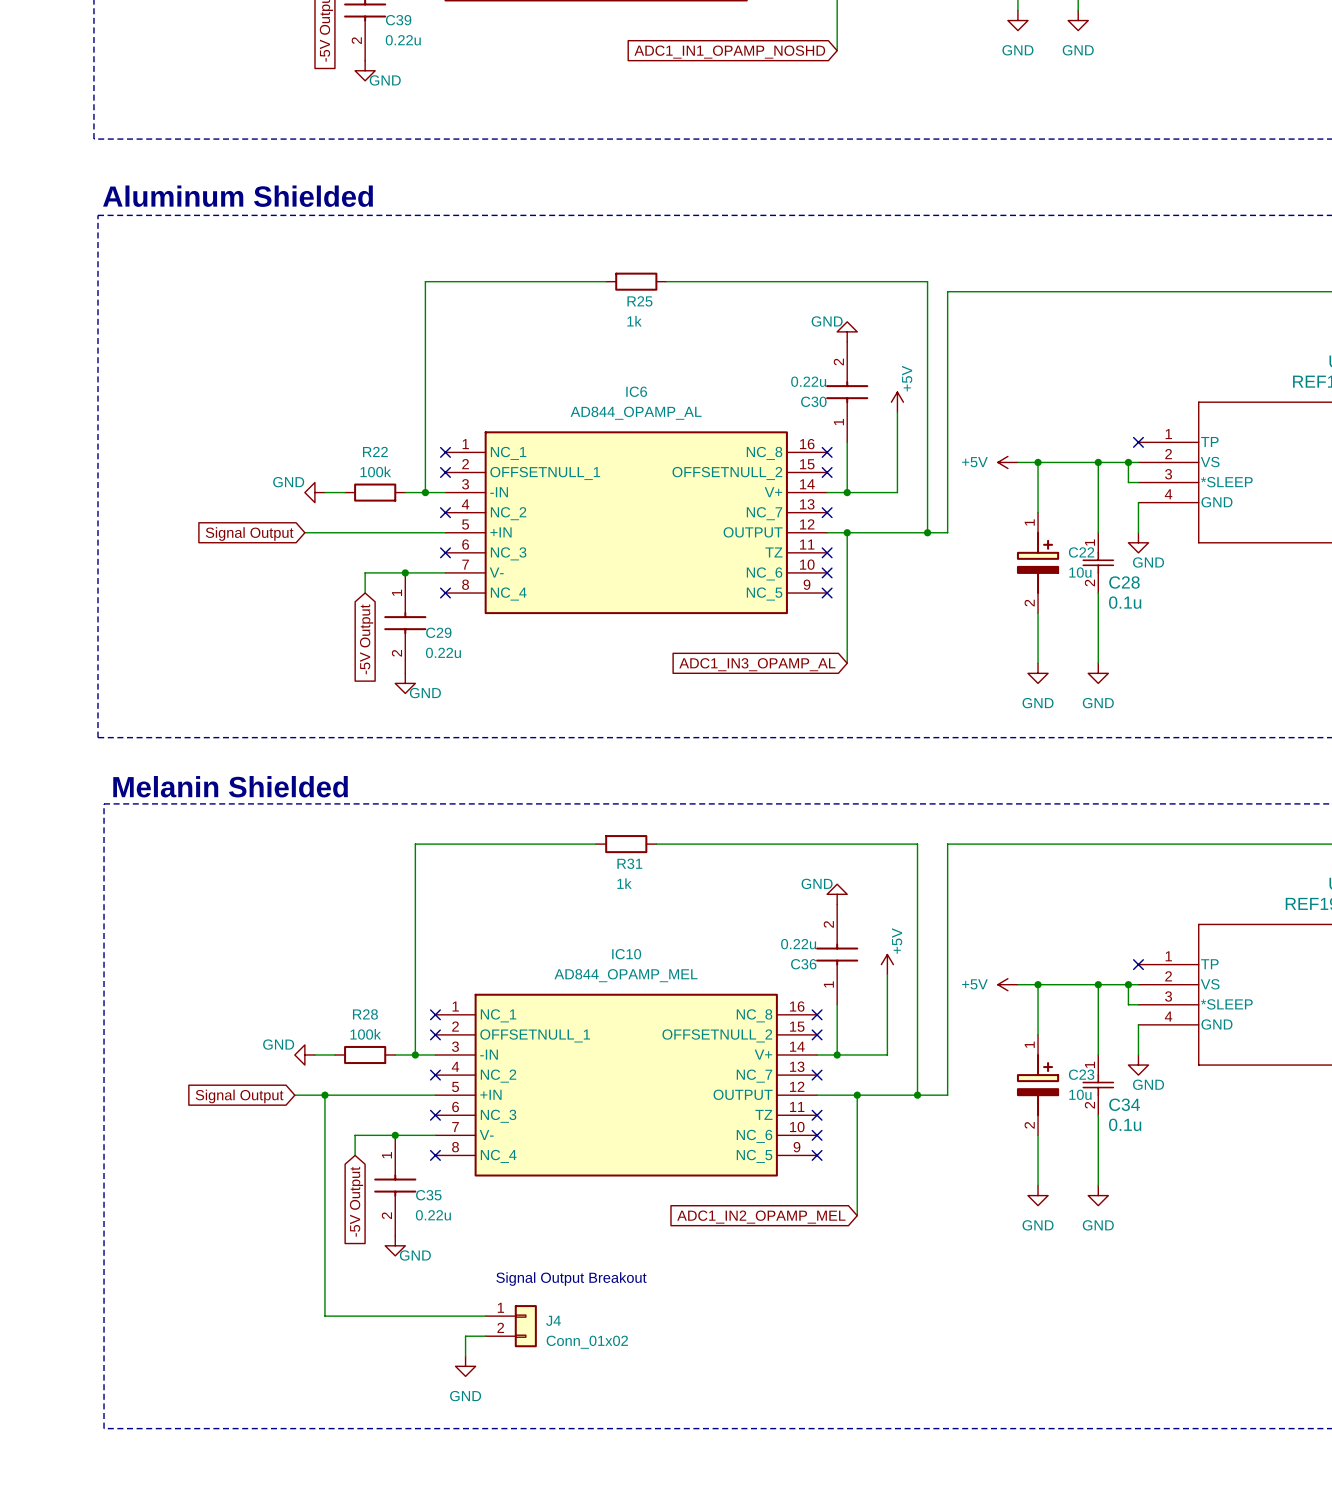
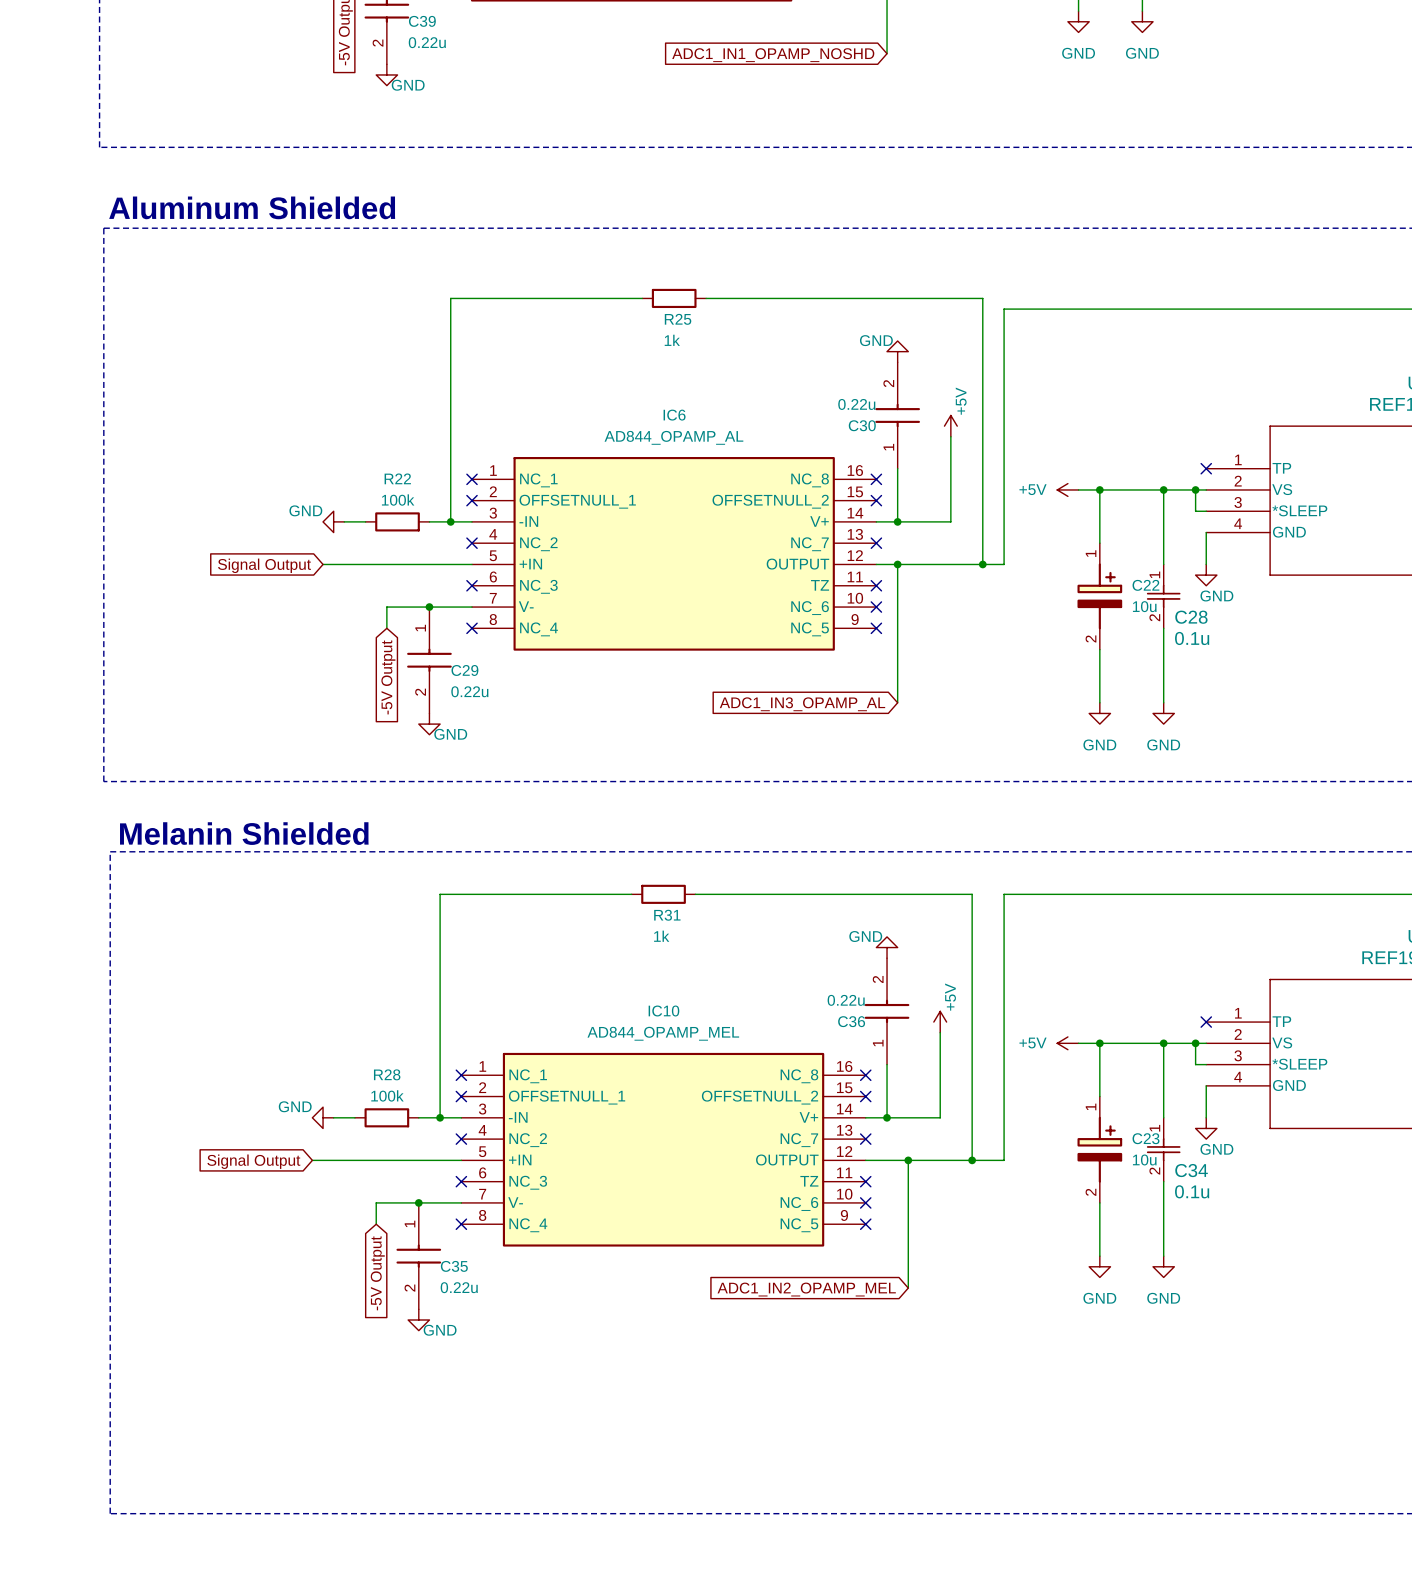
wire: (324, 1095) (324, 1316) (485, 1316) -> none
junction: (324, 1095) -> none
text: Signal Output Breakout (571, 1279) -> none
J4: Conn_01x02 (511, 1326) -> none
wire: (485, 1336) (465, 1336) (465, 1356) -> none
power symbol: GND (465, 1366) -> none

